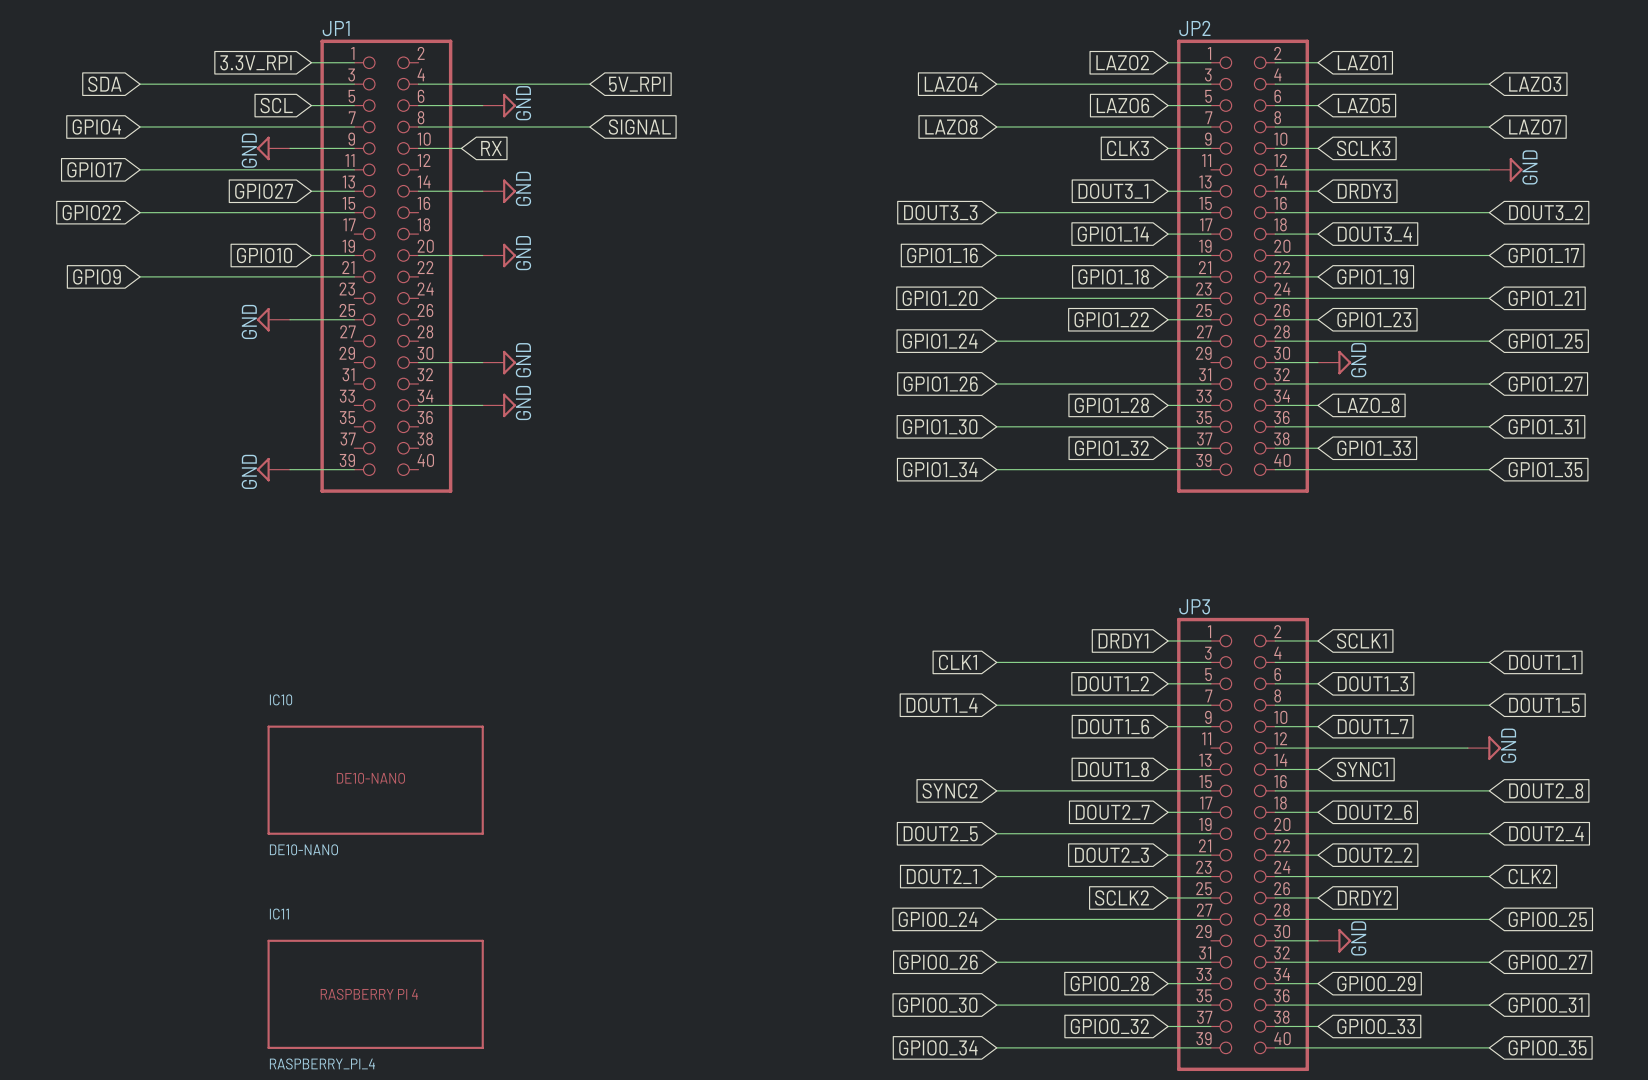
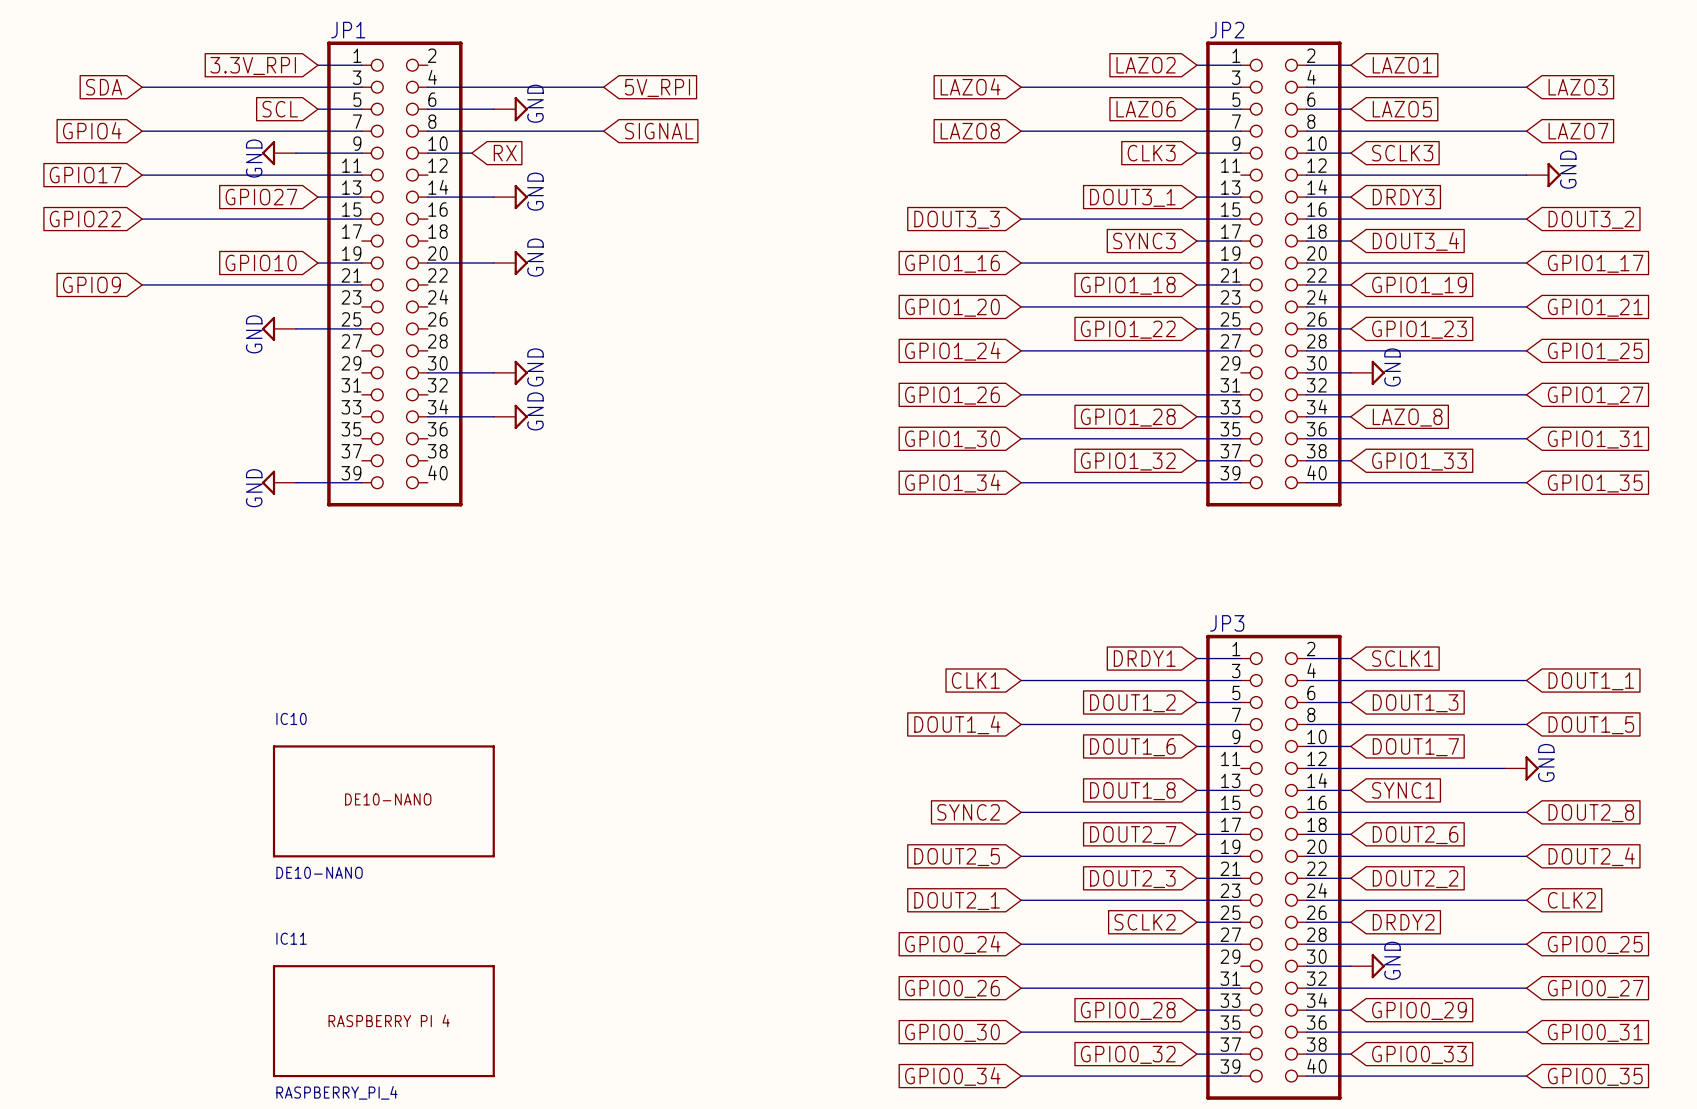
global label: GPIO1_14 (1113, 234) -> SYNC3 (1144, 241)

